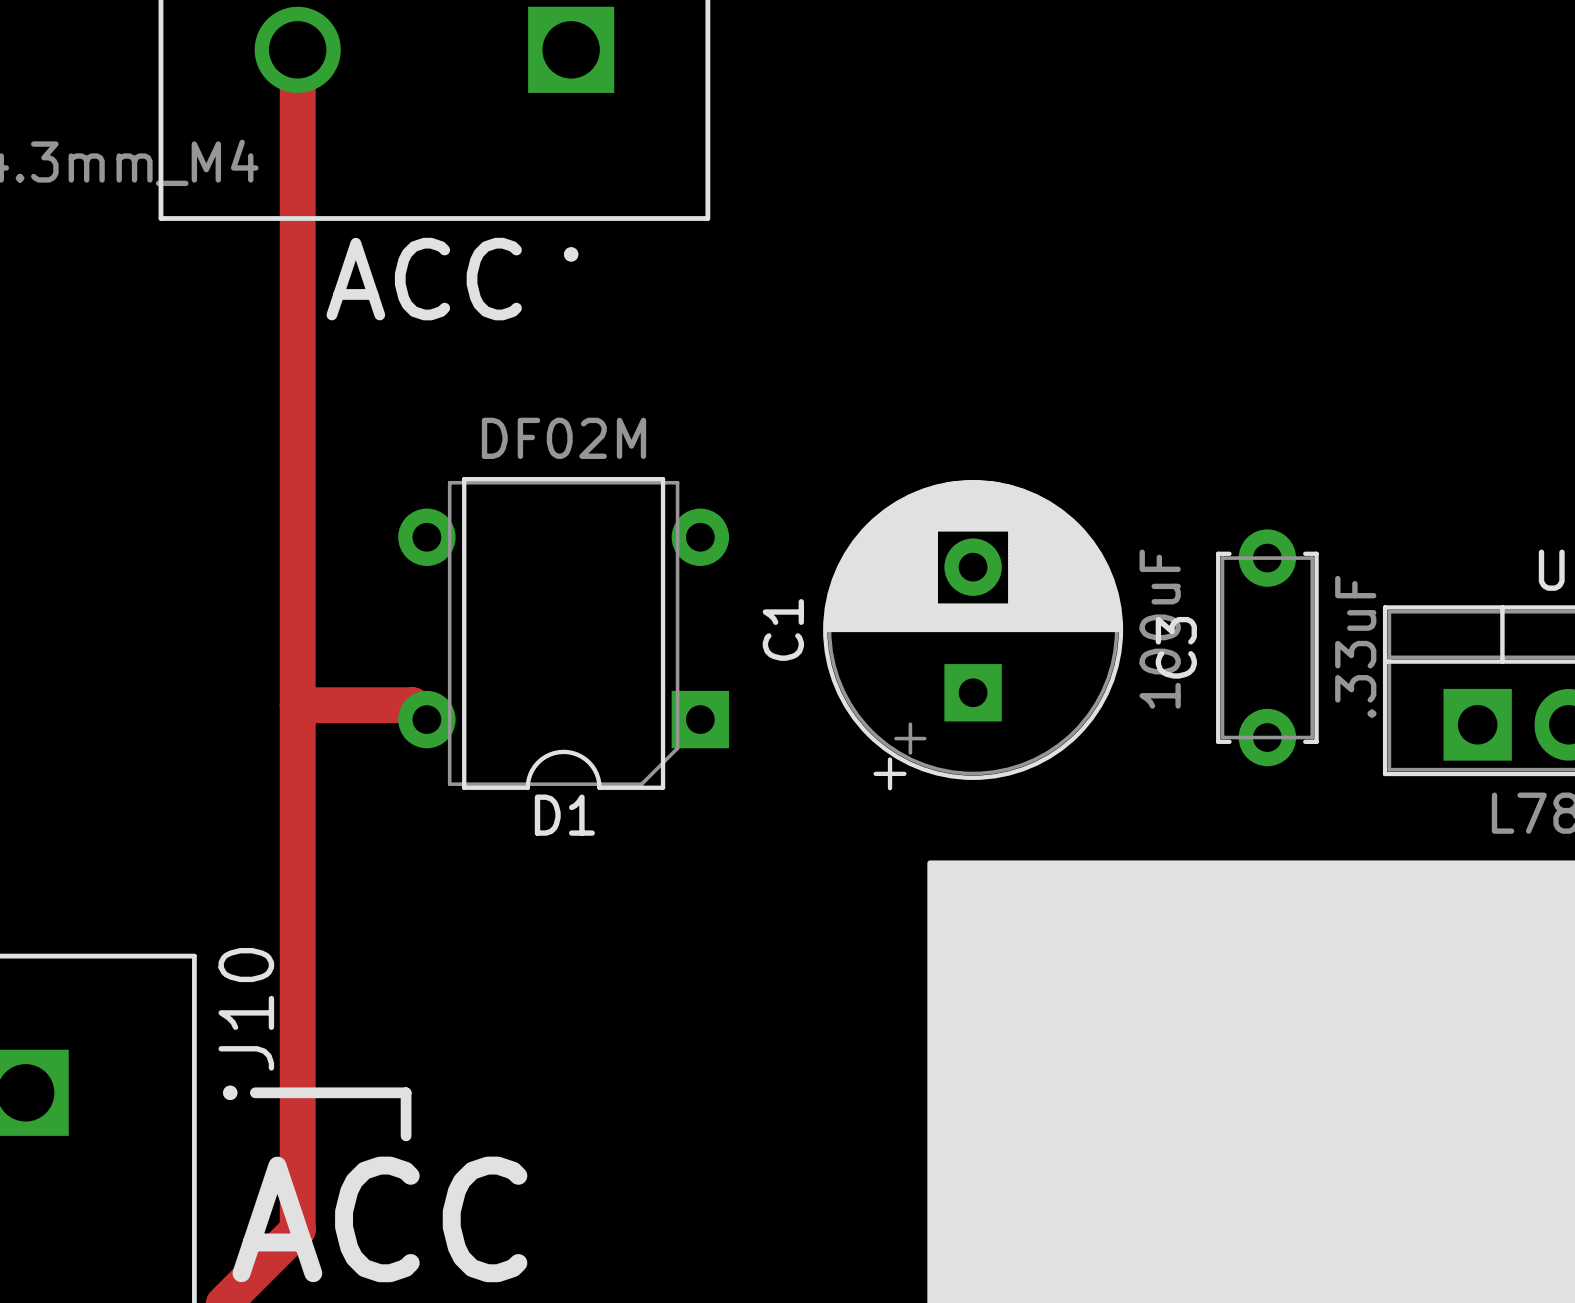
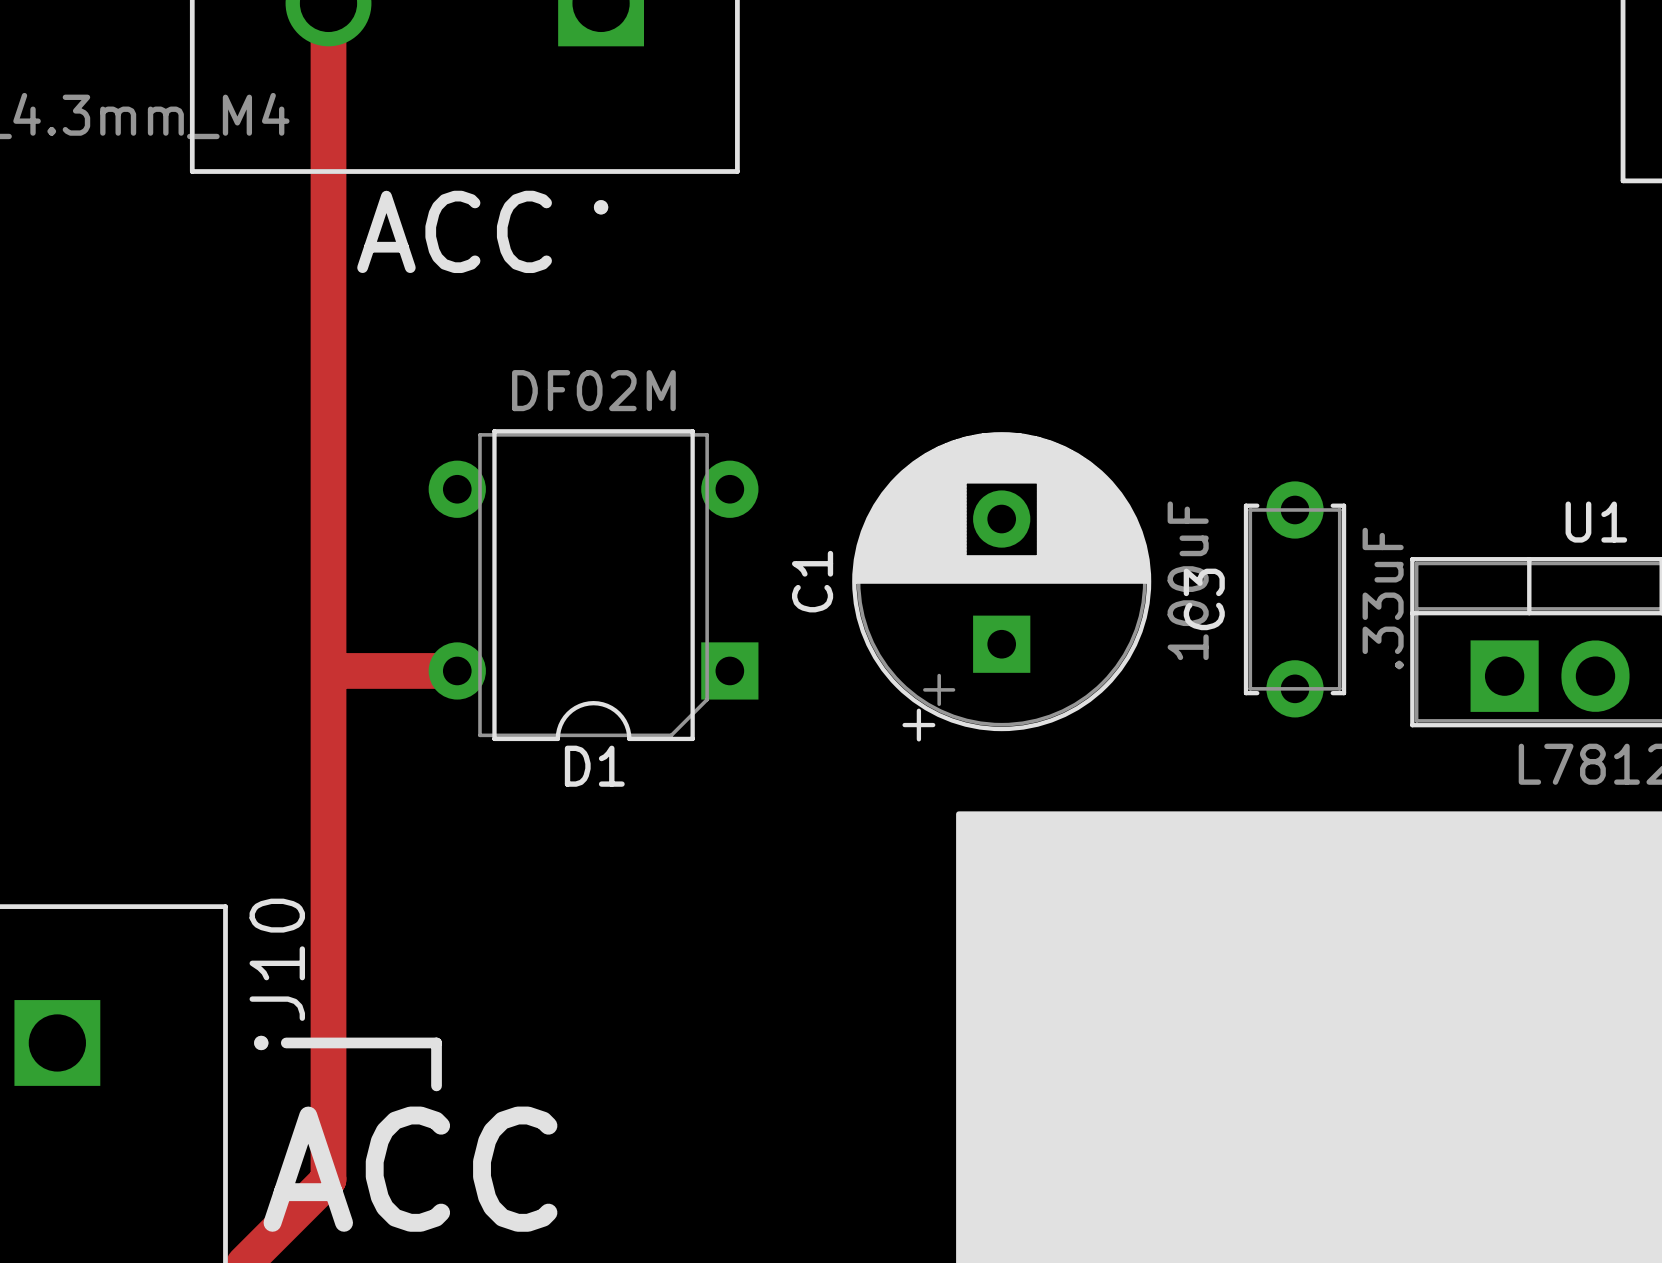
track: (297, 705) (412, 705) (426, 719) -> (329, 670) (457, 670)

